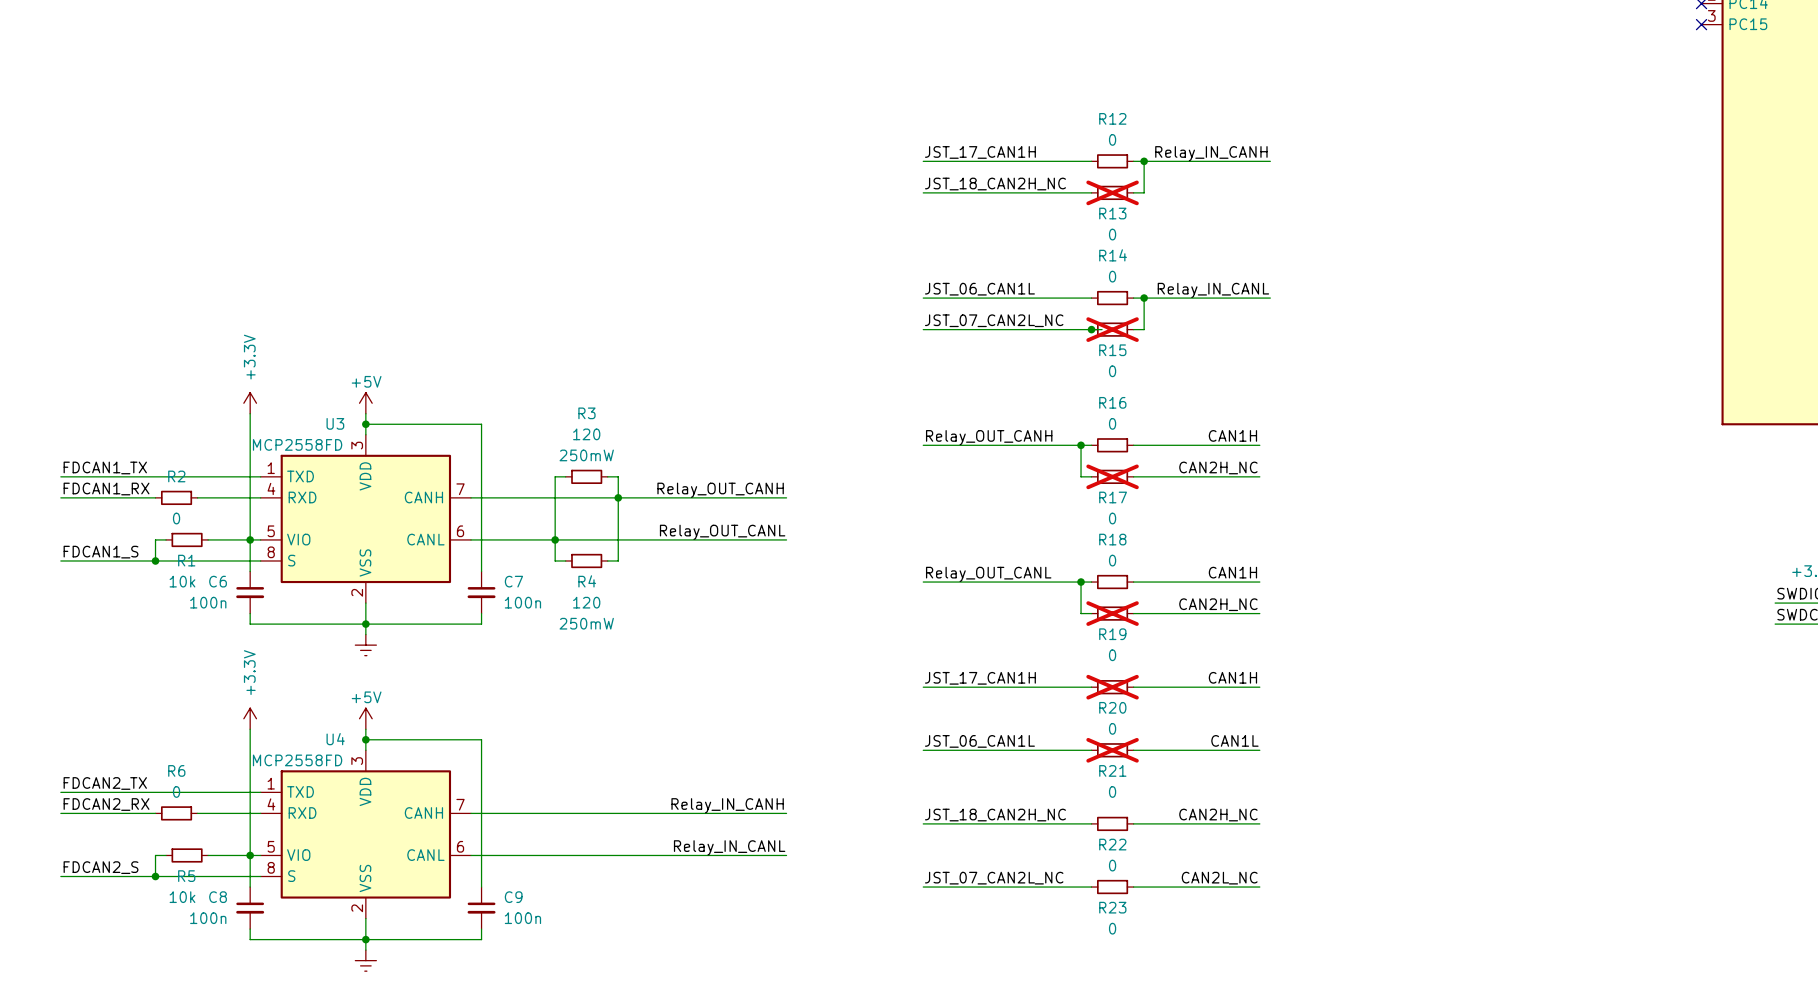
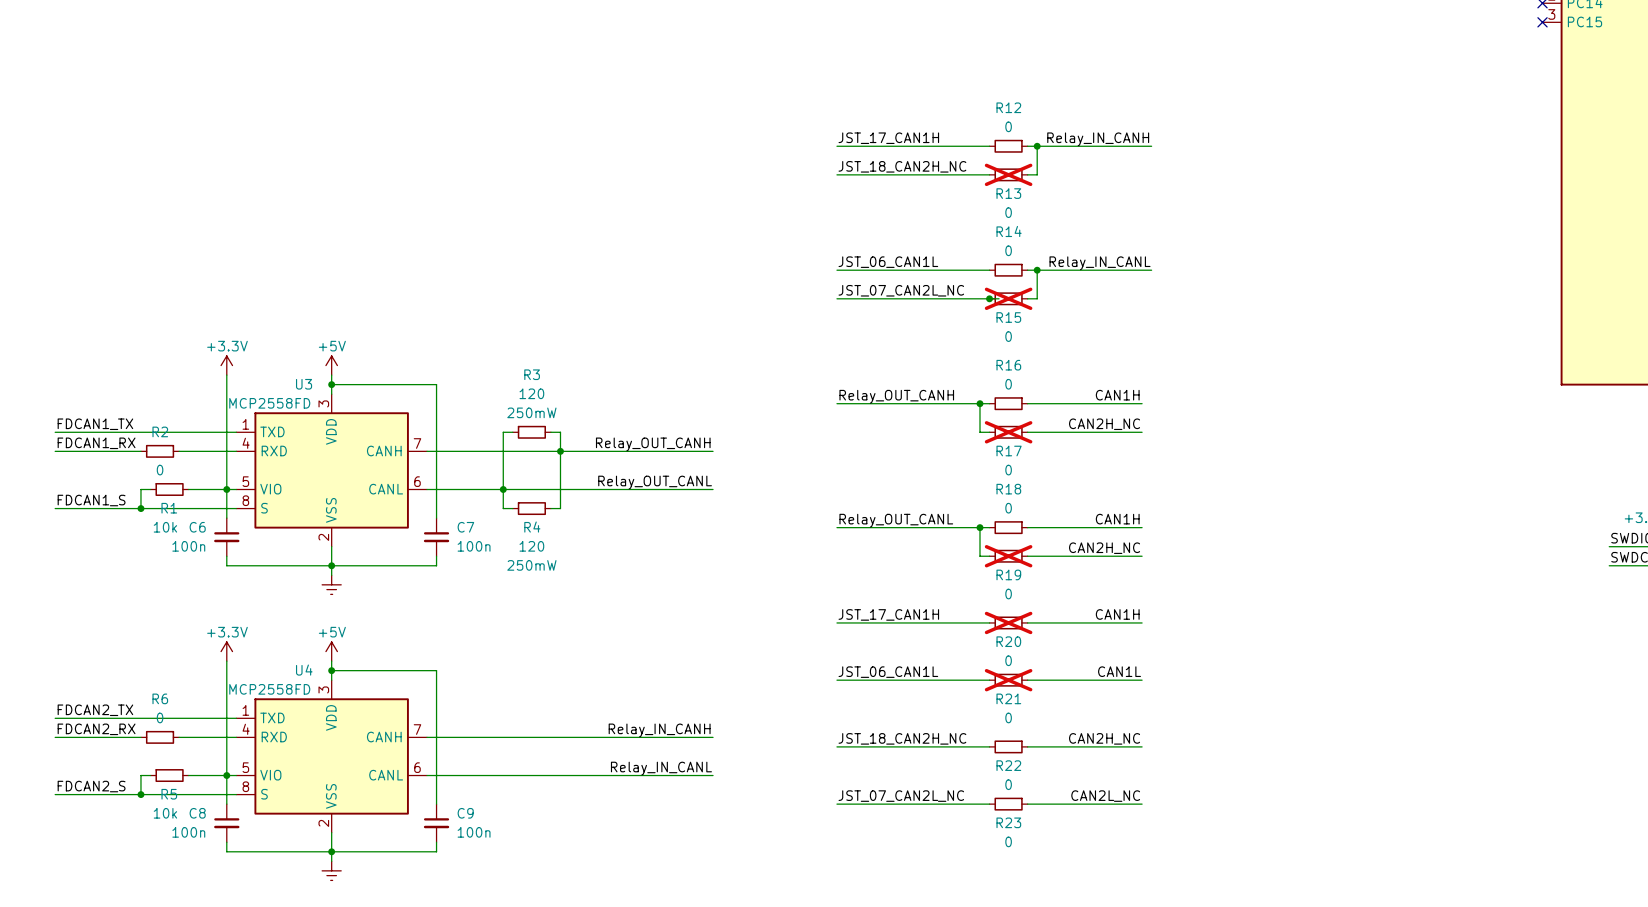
power symbol text rotation: 0° (249, 357) -> 90° clockwise (227, 346)
power symbol text rotation: 0° (249, 672) -> 90° clockwise (227, 632)

